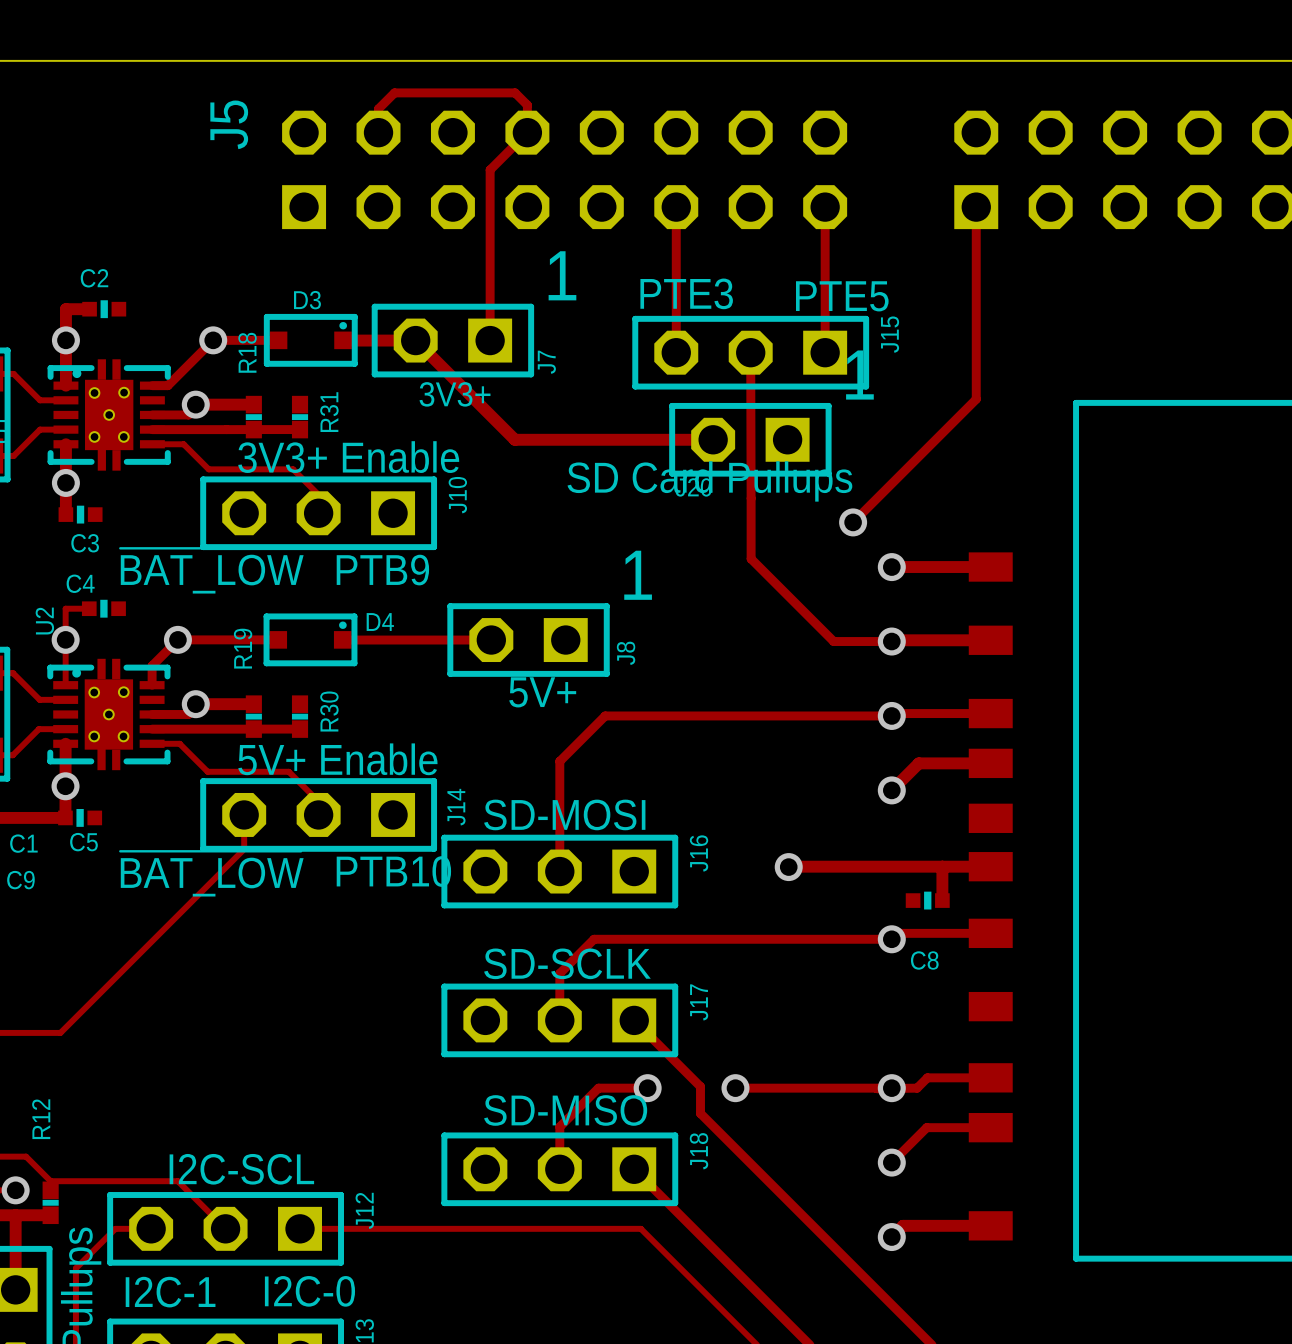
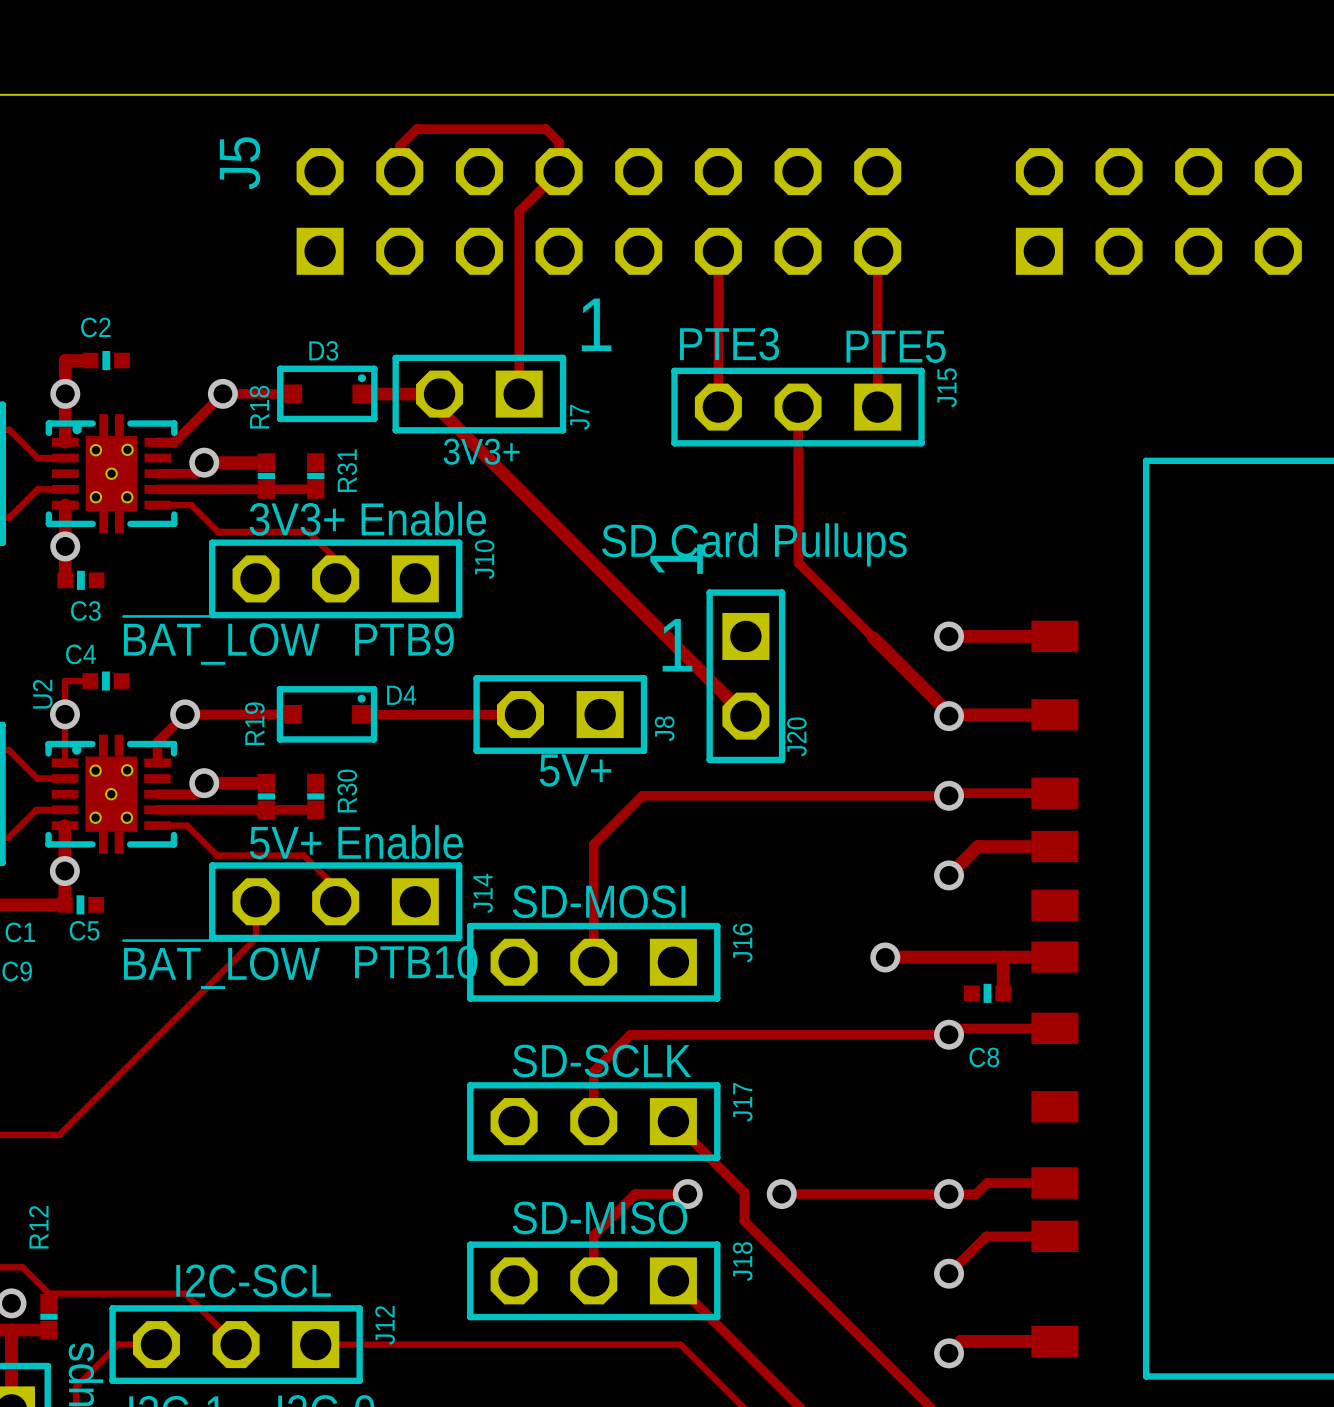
track: (976, 207) (976, 399) (853, 522) -> none
track: (415, 340) (514, 439) (713, 439) -> (439, 394) (439, 409) (745, 716)
J20 rotation: 0° (750, 439) -> 90° counterclockwise (745, 676)
J20 position: (750, 439) -> (745, 676)
track: (751, 498) (751, 558) (833, 641) (891, 641) -> (798, 562) (950, 714)
via: (853, 522) -> none
track: (789, 866) (832, 866) -> none
via position: (788, 867) -> (885, 957)

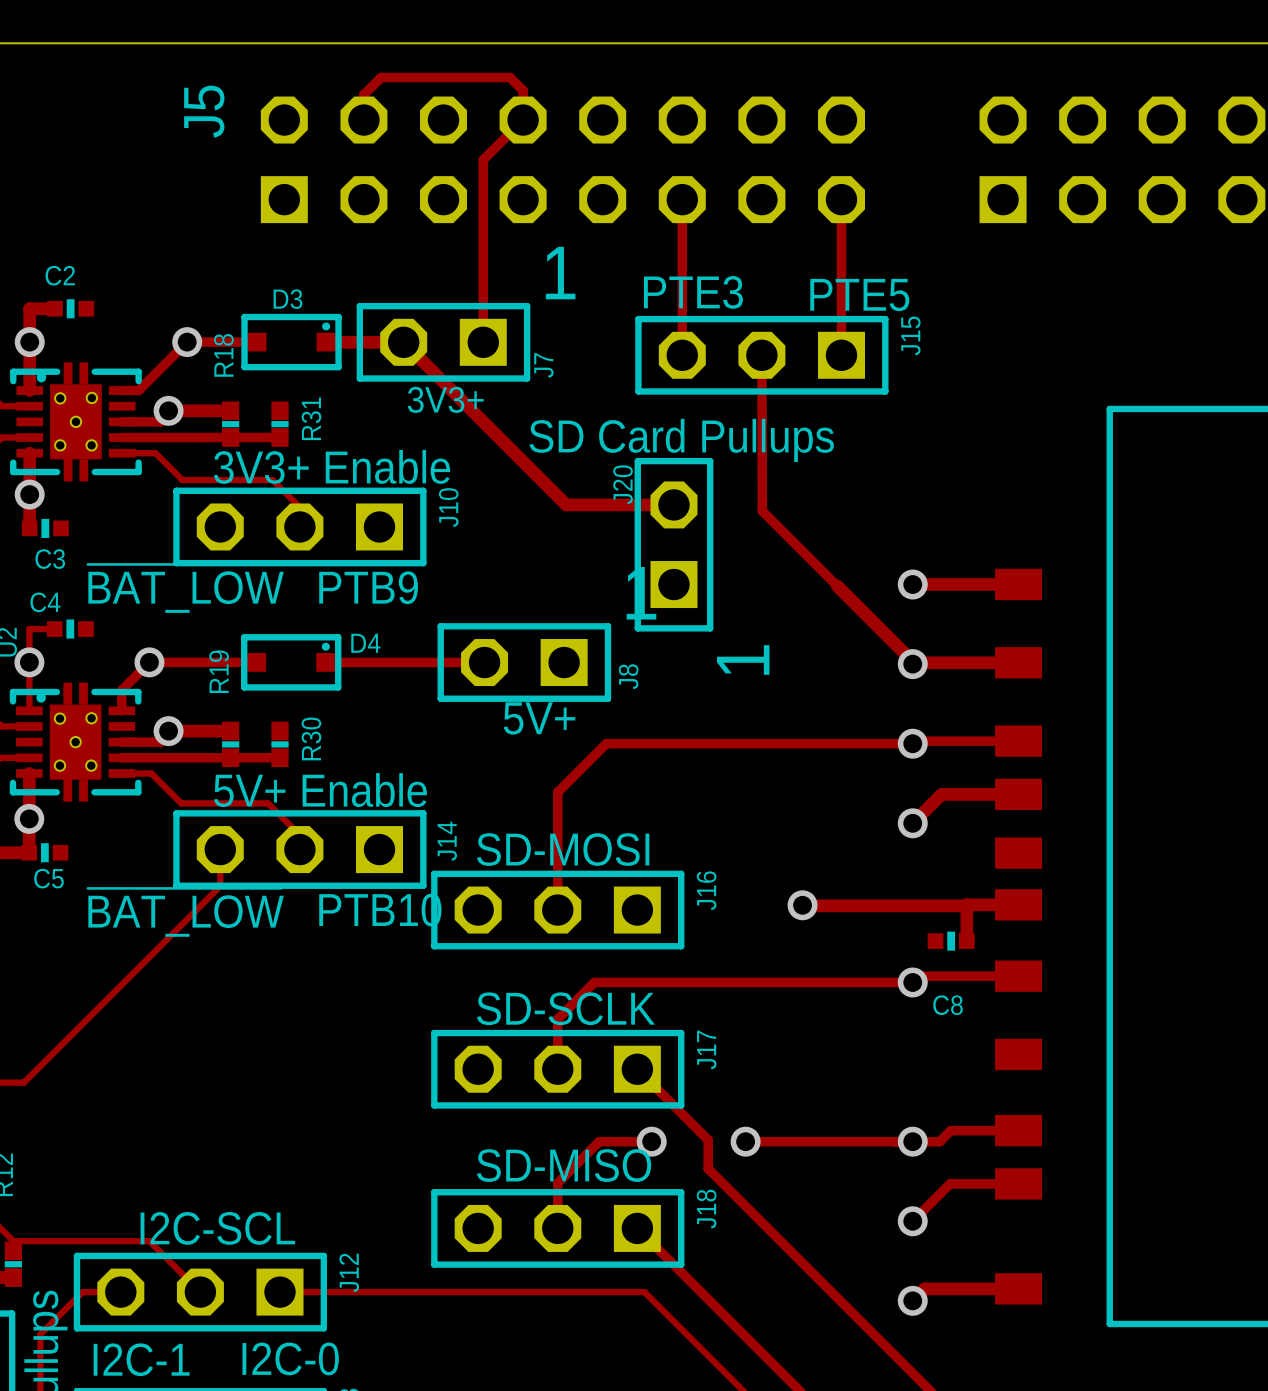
track: (439, 394) (439, 409) (745, 716) -> (403, 342) (566, 504) (673, 504)
text position: SD Card Pullups (754, 544) -> SD Card Pullups (681, 440)
J20 footprint: [706, 589, 786, 764] -> [634, 457, 714, 632]
J20 name position: J20 (796, 736) -> J20 (623, 484)
track: (885, 957) (1003, 957) -> (802, 905) (801, 905) (966, 905)
via position: (885, 957) -> (802, 905)

